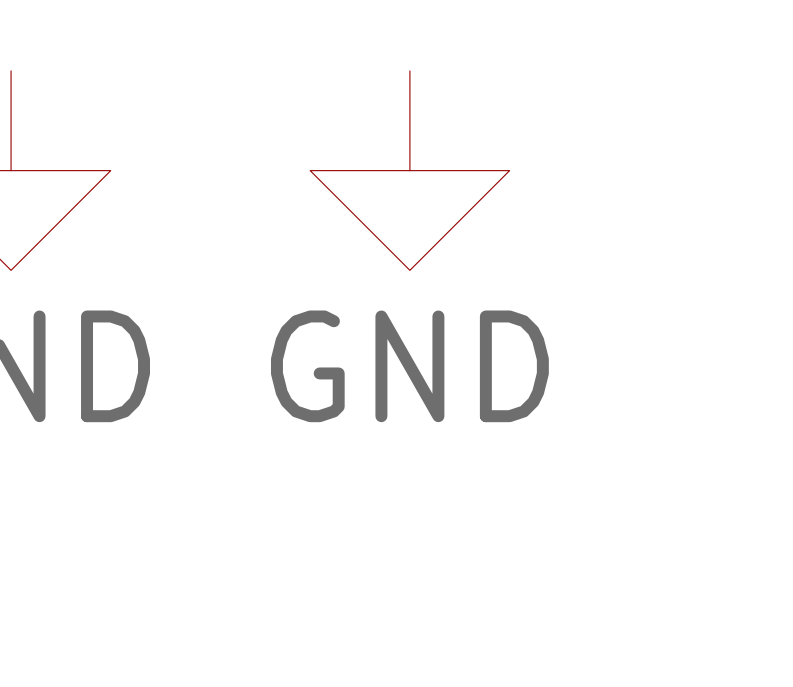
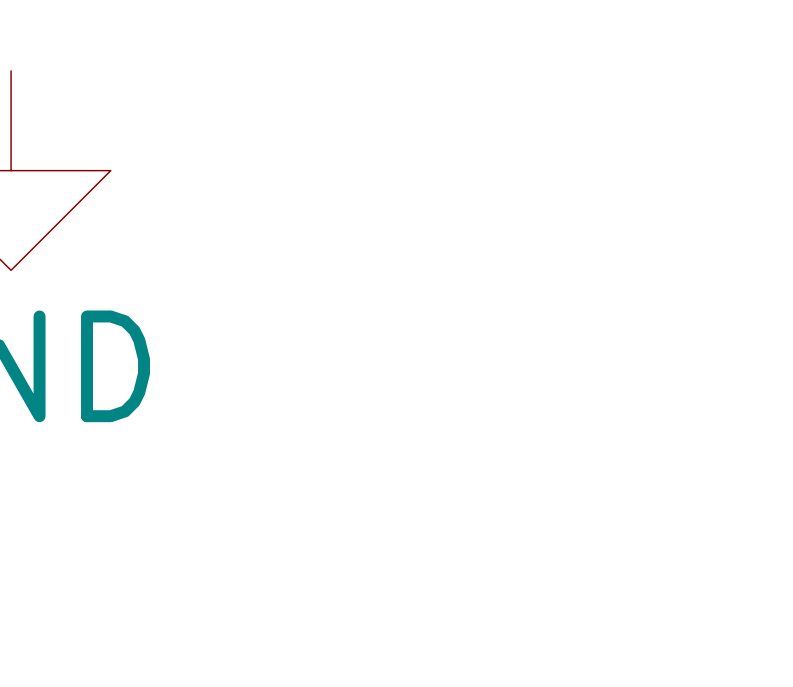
power symbol: GND (409, 170) -> none

